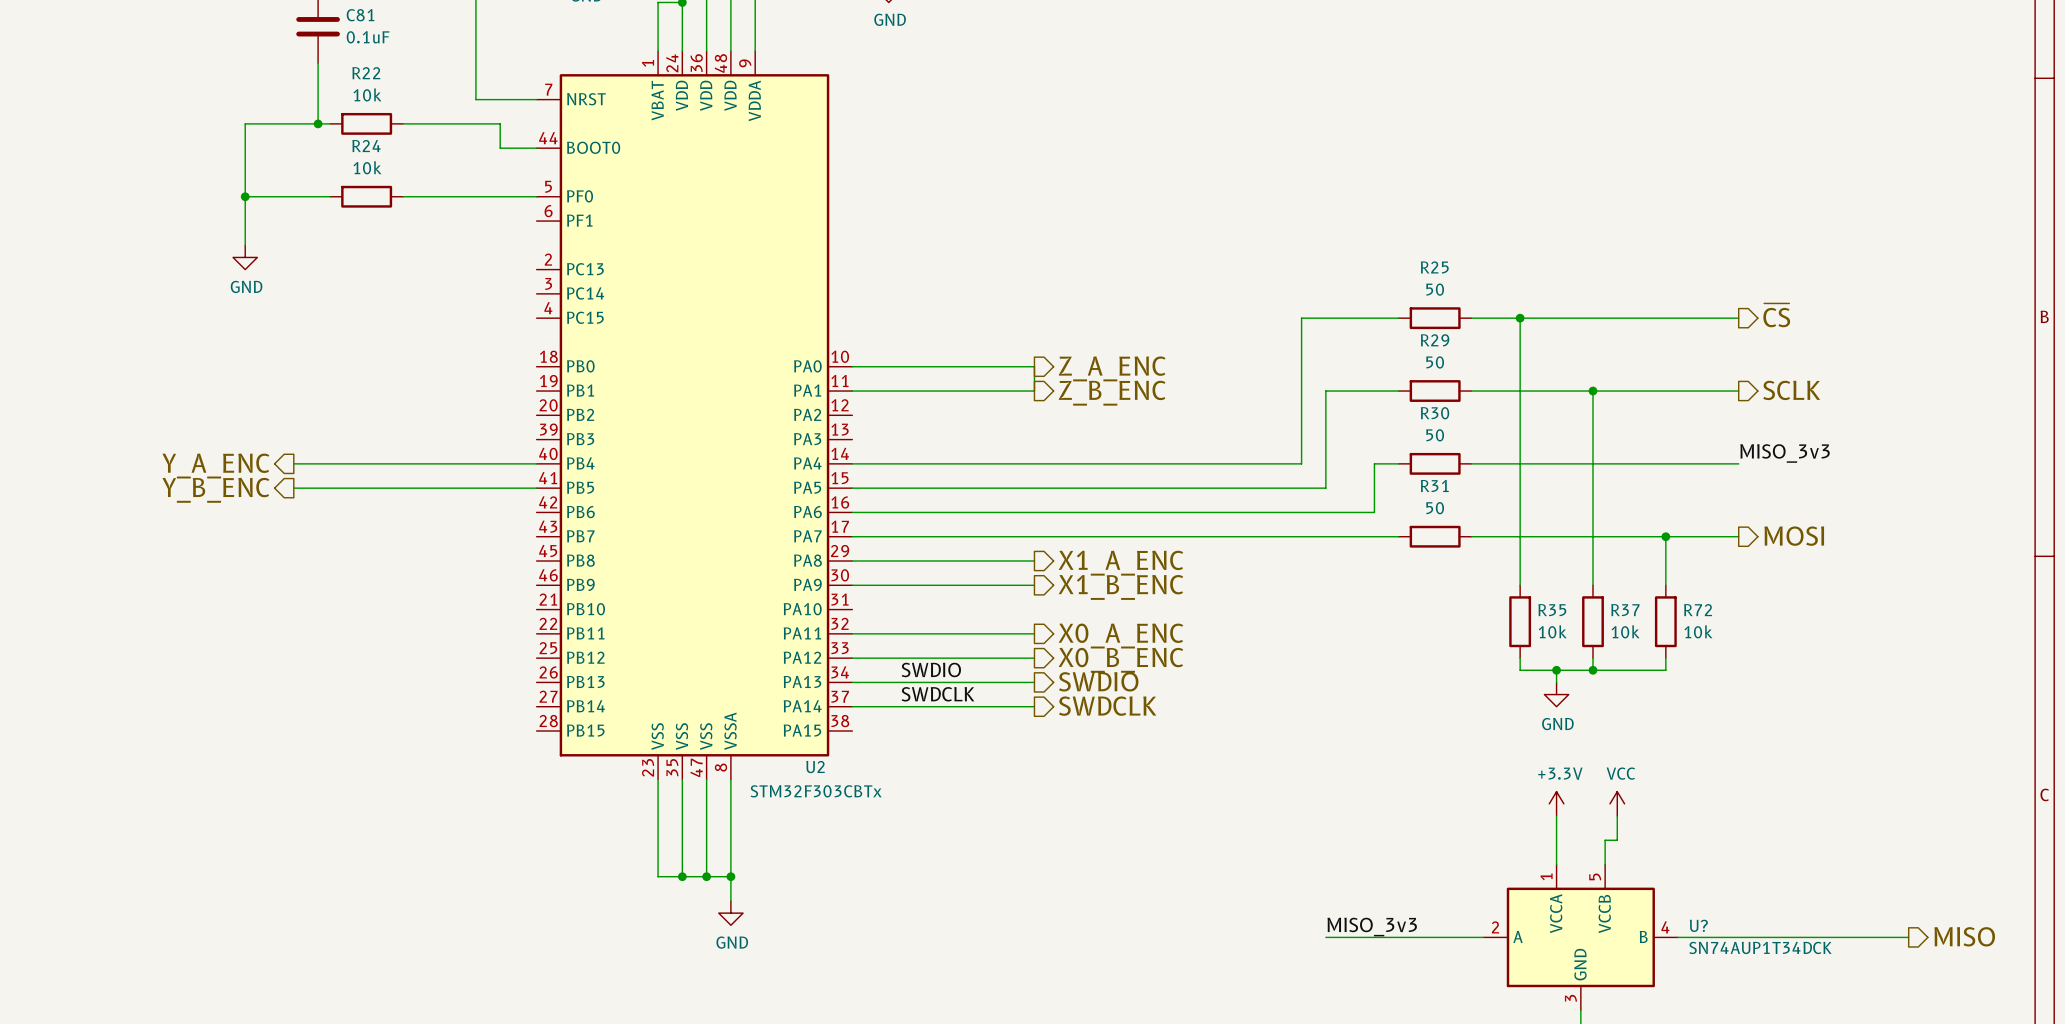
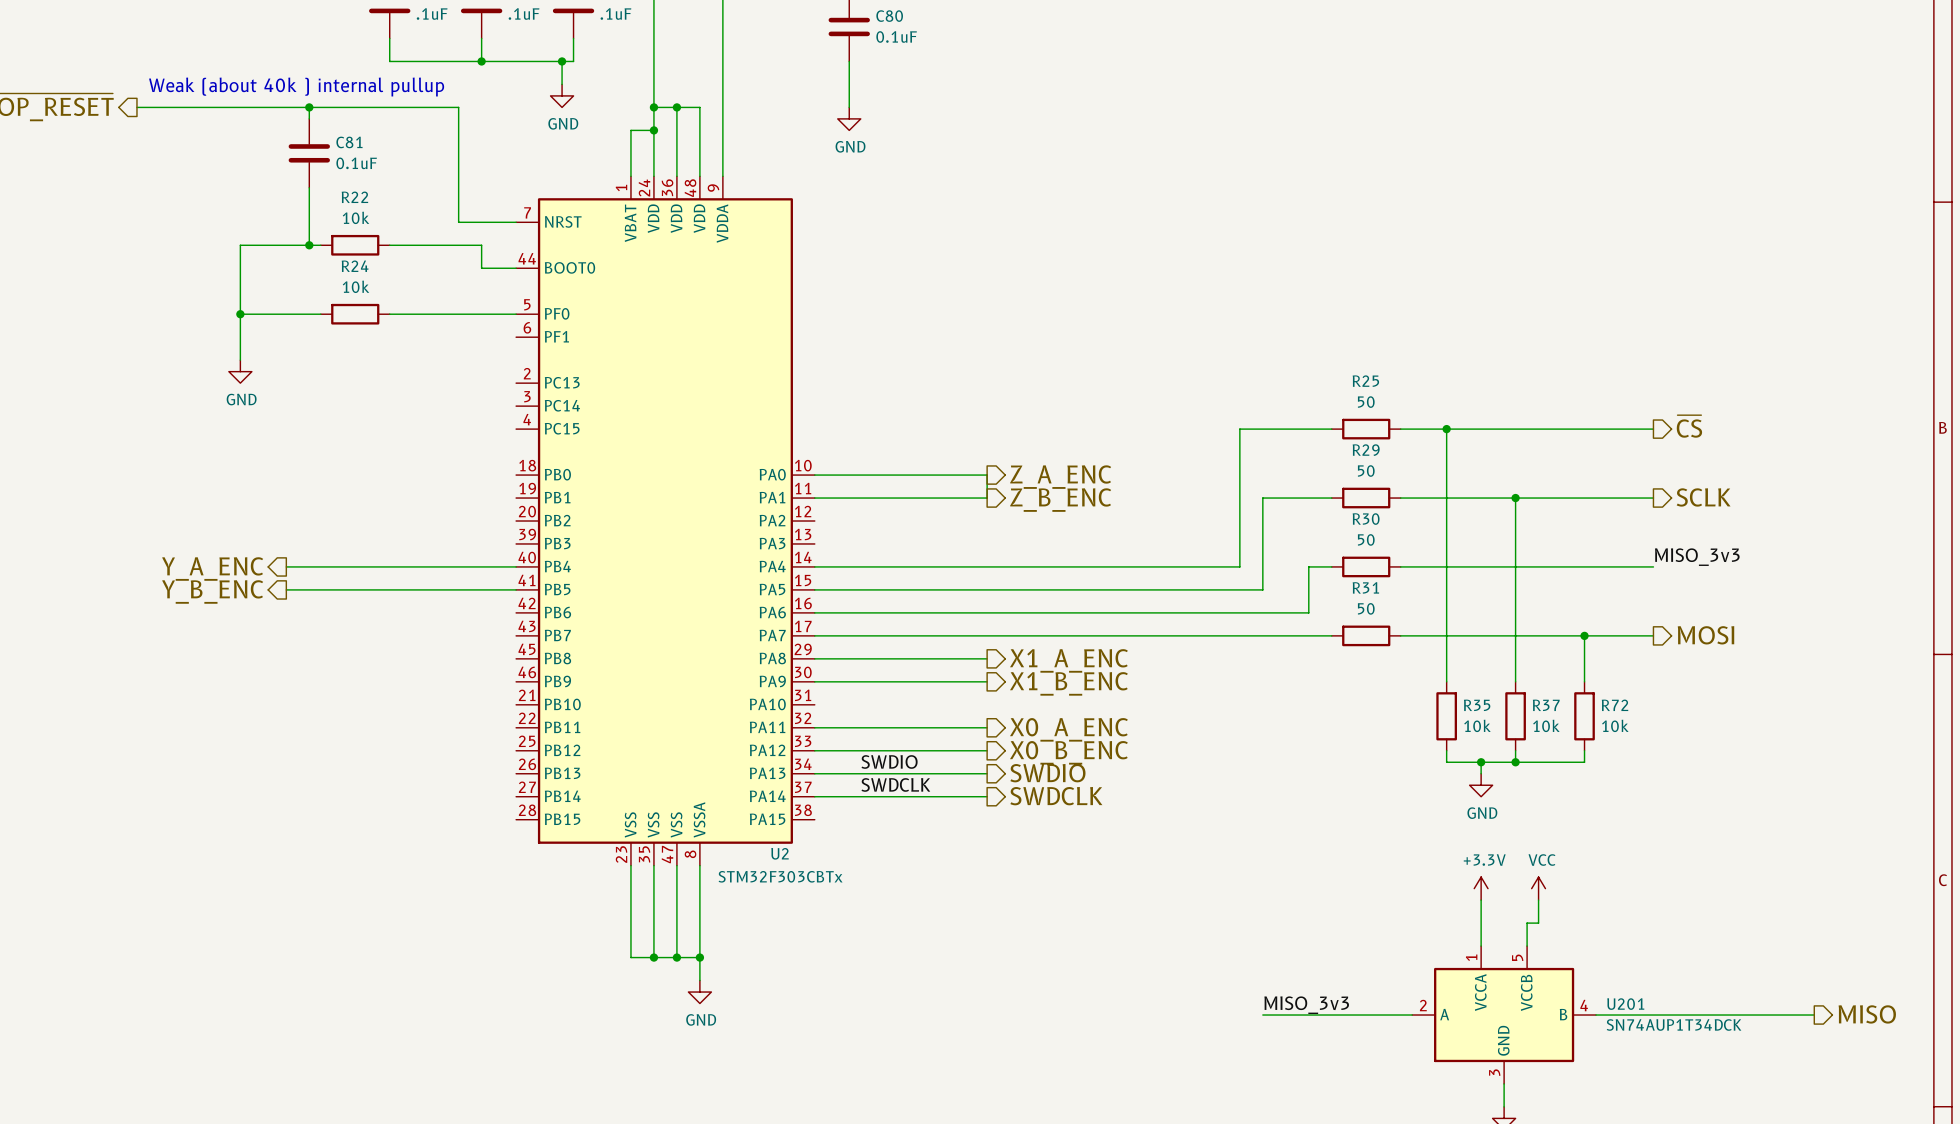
U? name: U? (1698, 925) -> U201 (1625, 1004)

